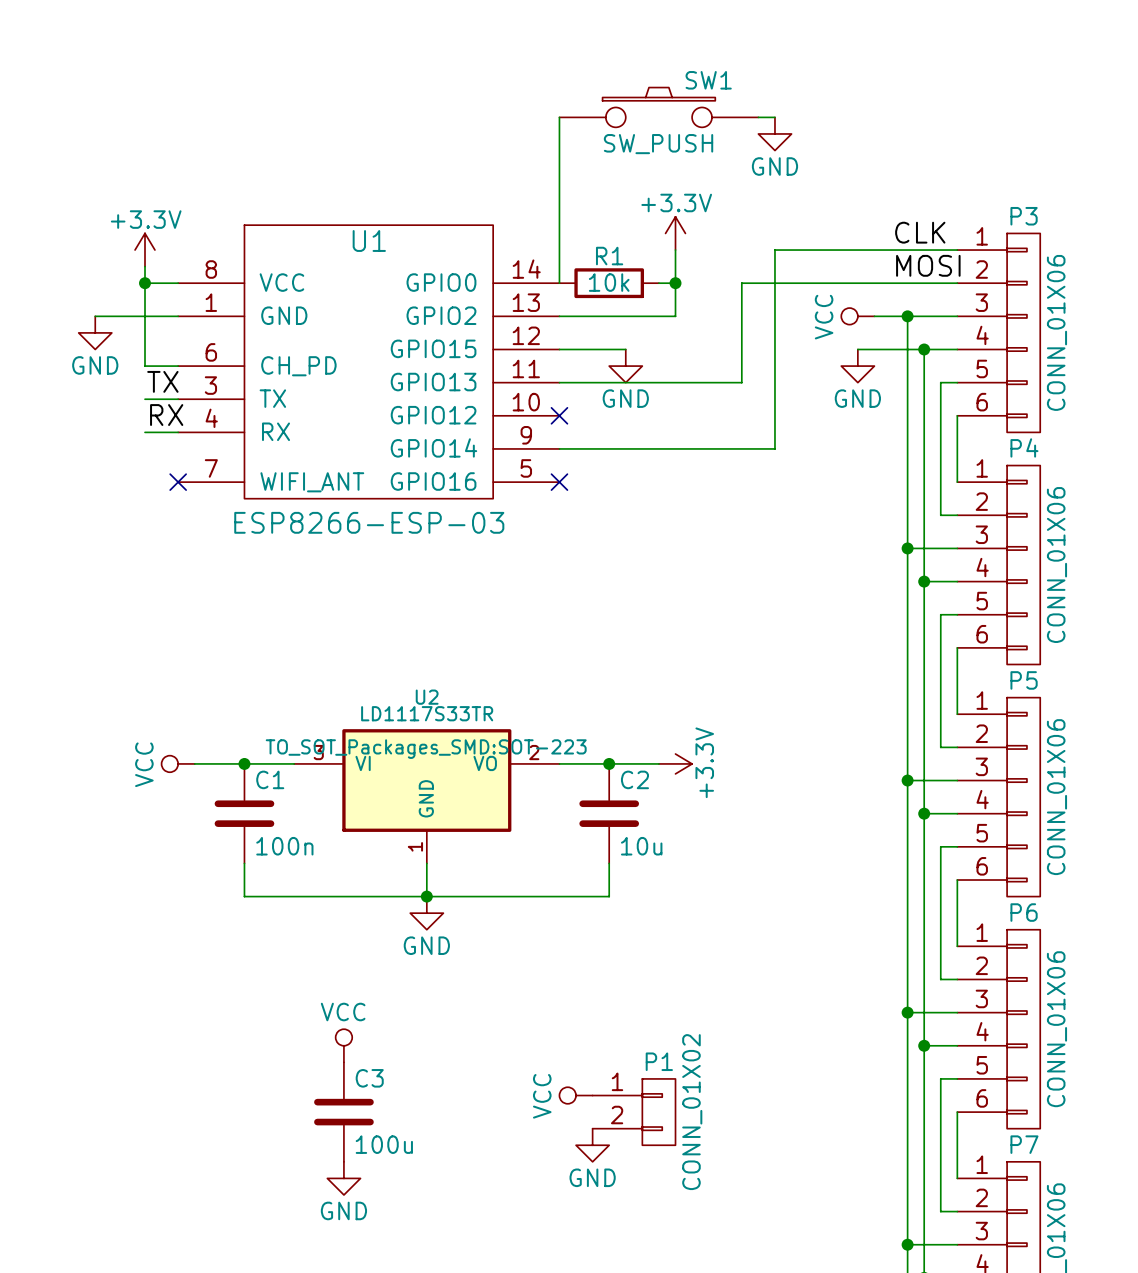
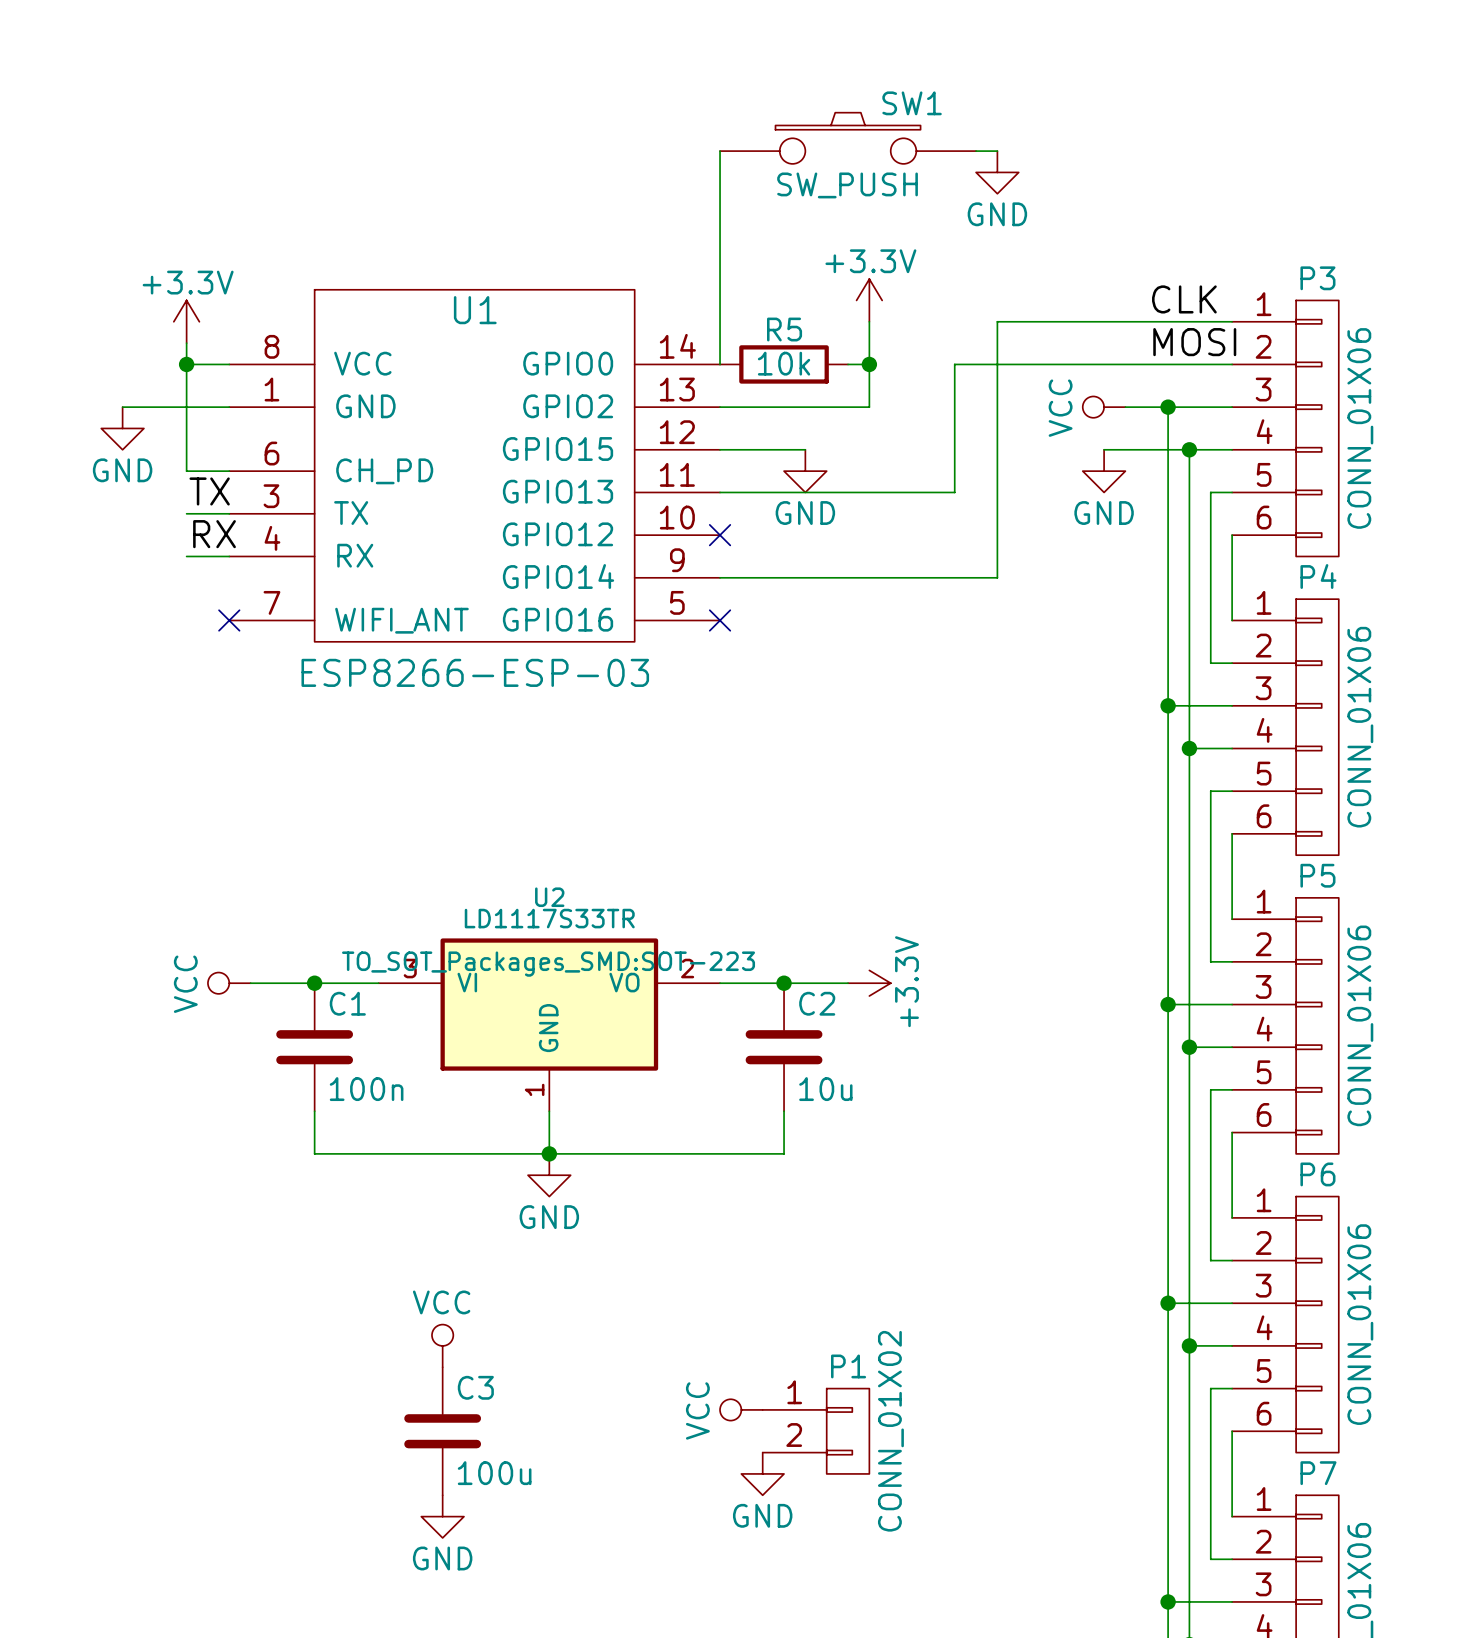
R1 name: R1 (609, 256) -> R5 (784, 329)

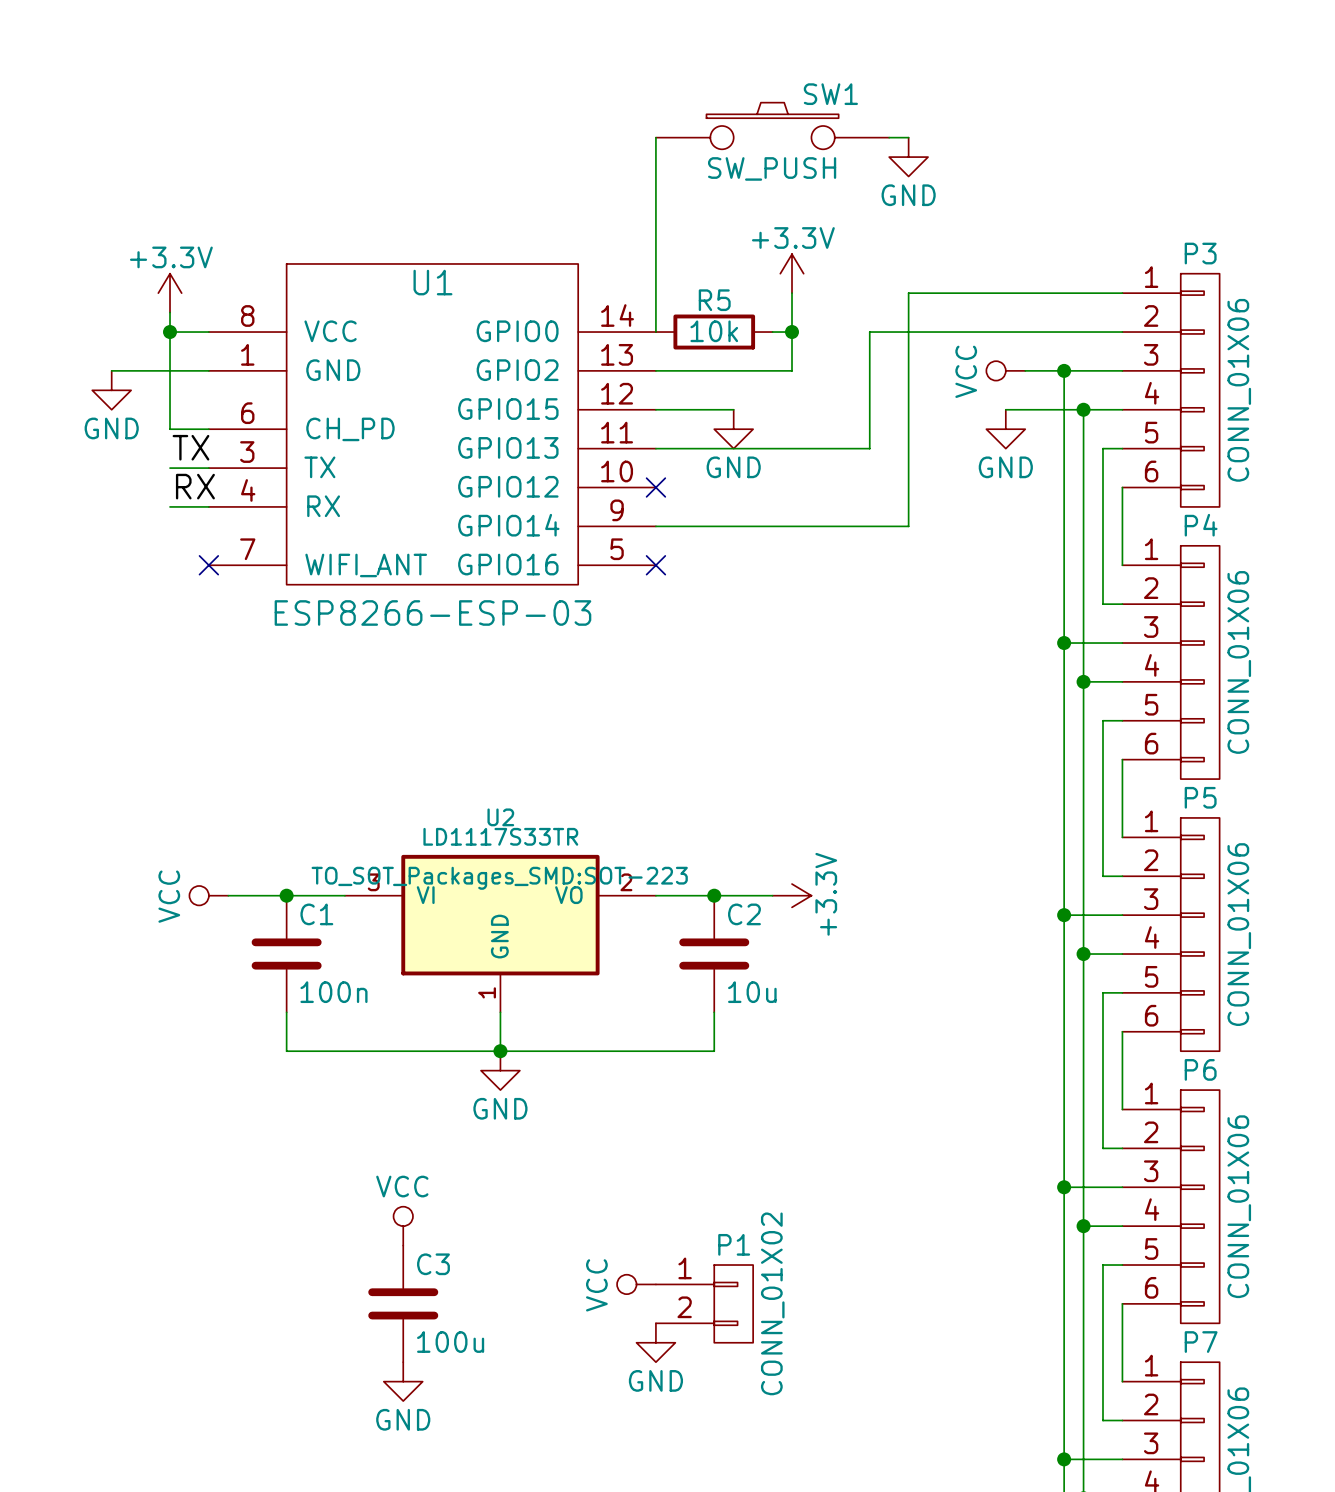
label: CLK (1184, 299) -> none
label: MOSI (1194, 342) -> none
power symbol position: VCC (741, 1409) -> VCC (636, 1284)
P1 position: (816, 1431) -> (704, 1303)
power symbol position: GND (762, 1473) -> GND (655, 1342)

